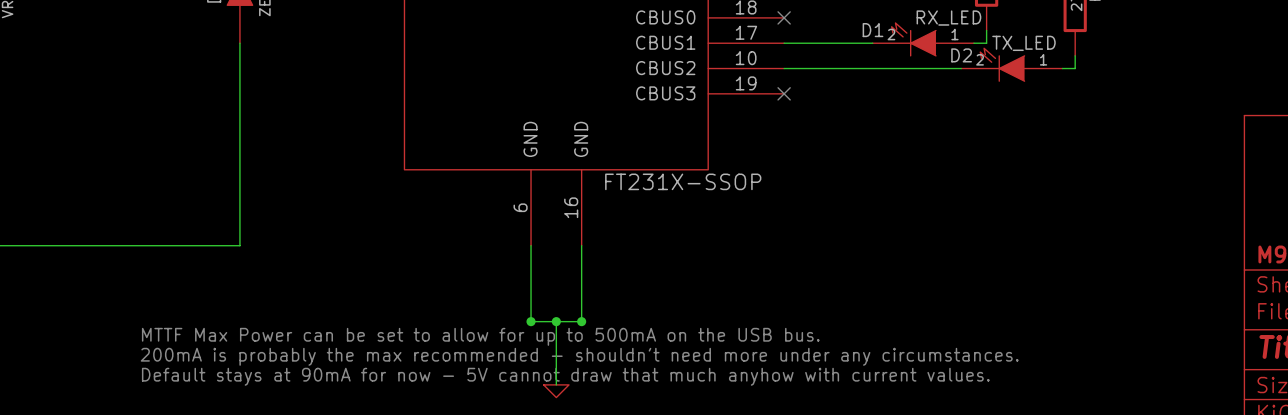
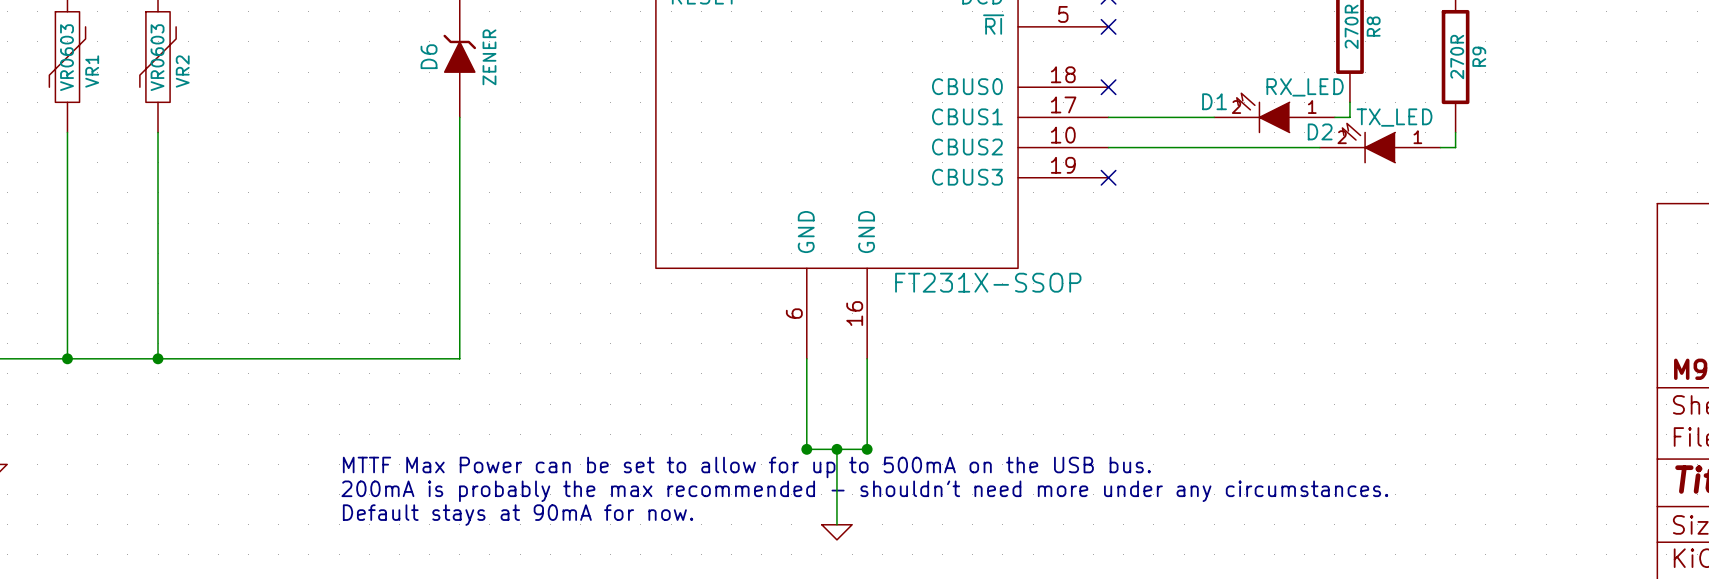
text: Default stays at 90mA for now - 5V cannot draw that much anyhow with current values. (565, 376) -> Default stays at 90mA for now. (518, 515)

